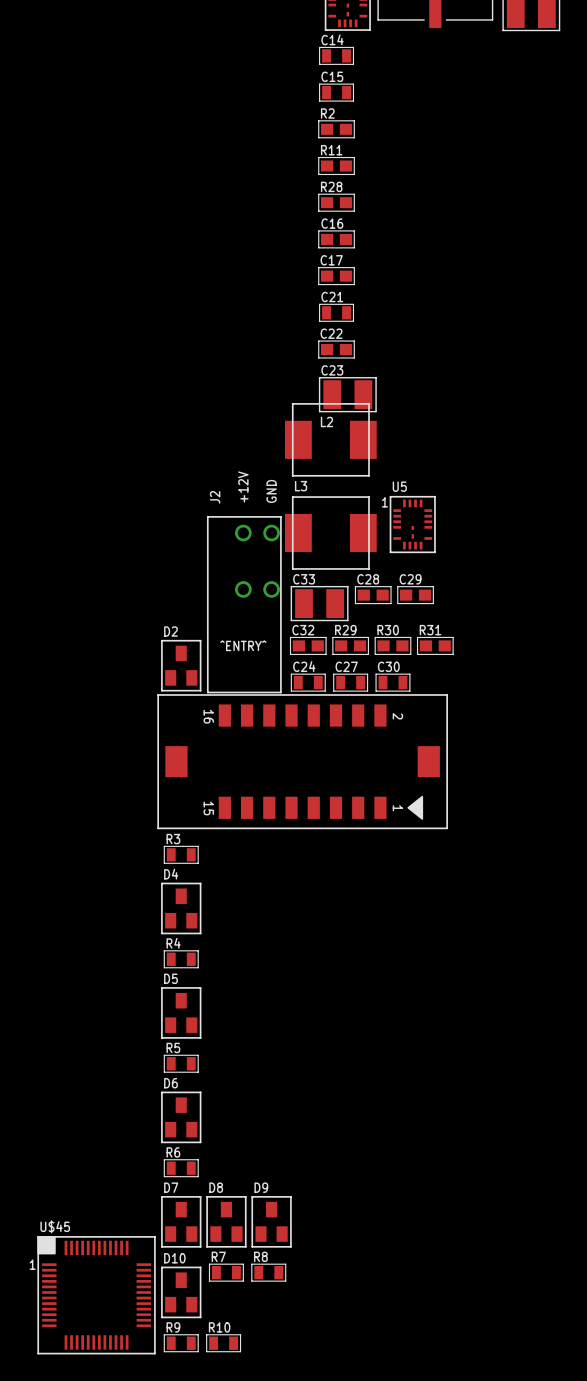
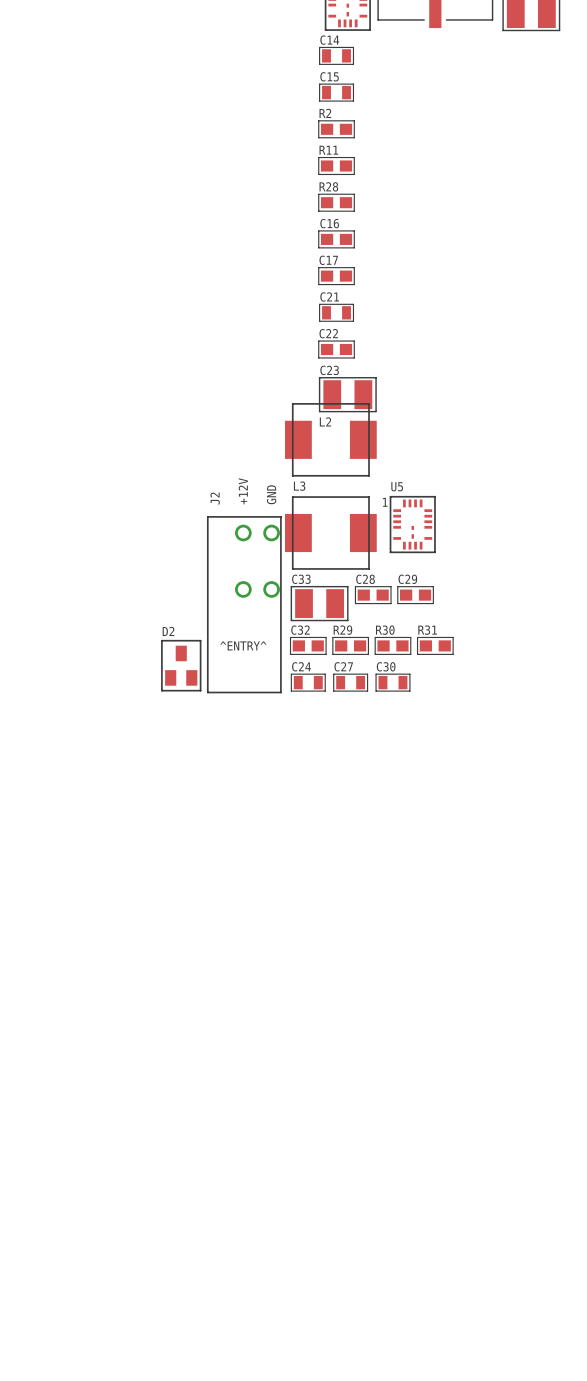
part: (302, 761) -> none
R3: (181, 854) -> none
D4: (181, 908) -> none
R4: (181, 959) -> none
D5: (181, 1012) -> none
R5: (181, 1063) -> none
D6: (181, 1117) -> none
R6: (181, 1168) -> none
D7: (181, 1221) -> none
D8: (226, 1221) -> none
D9: (271, 1221) -> none
R7: (226, 1272) -> none
R8: (268, 1272) -> none
D10: (181, 1292) -> none
U$45: (96, 1295) -> none
R9: (181, 1343) -> none
R10: (223, 1343) -> none

